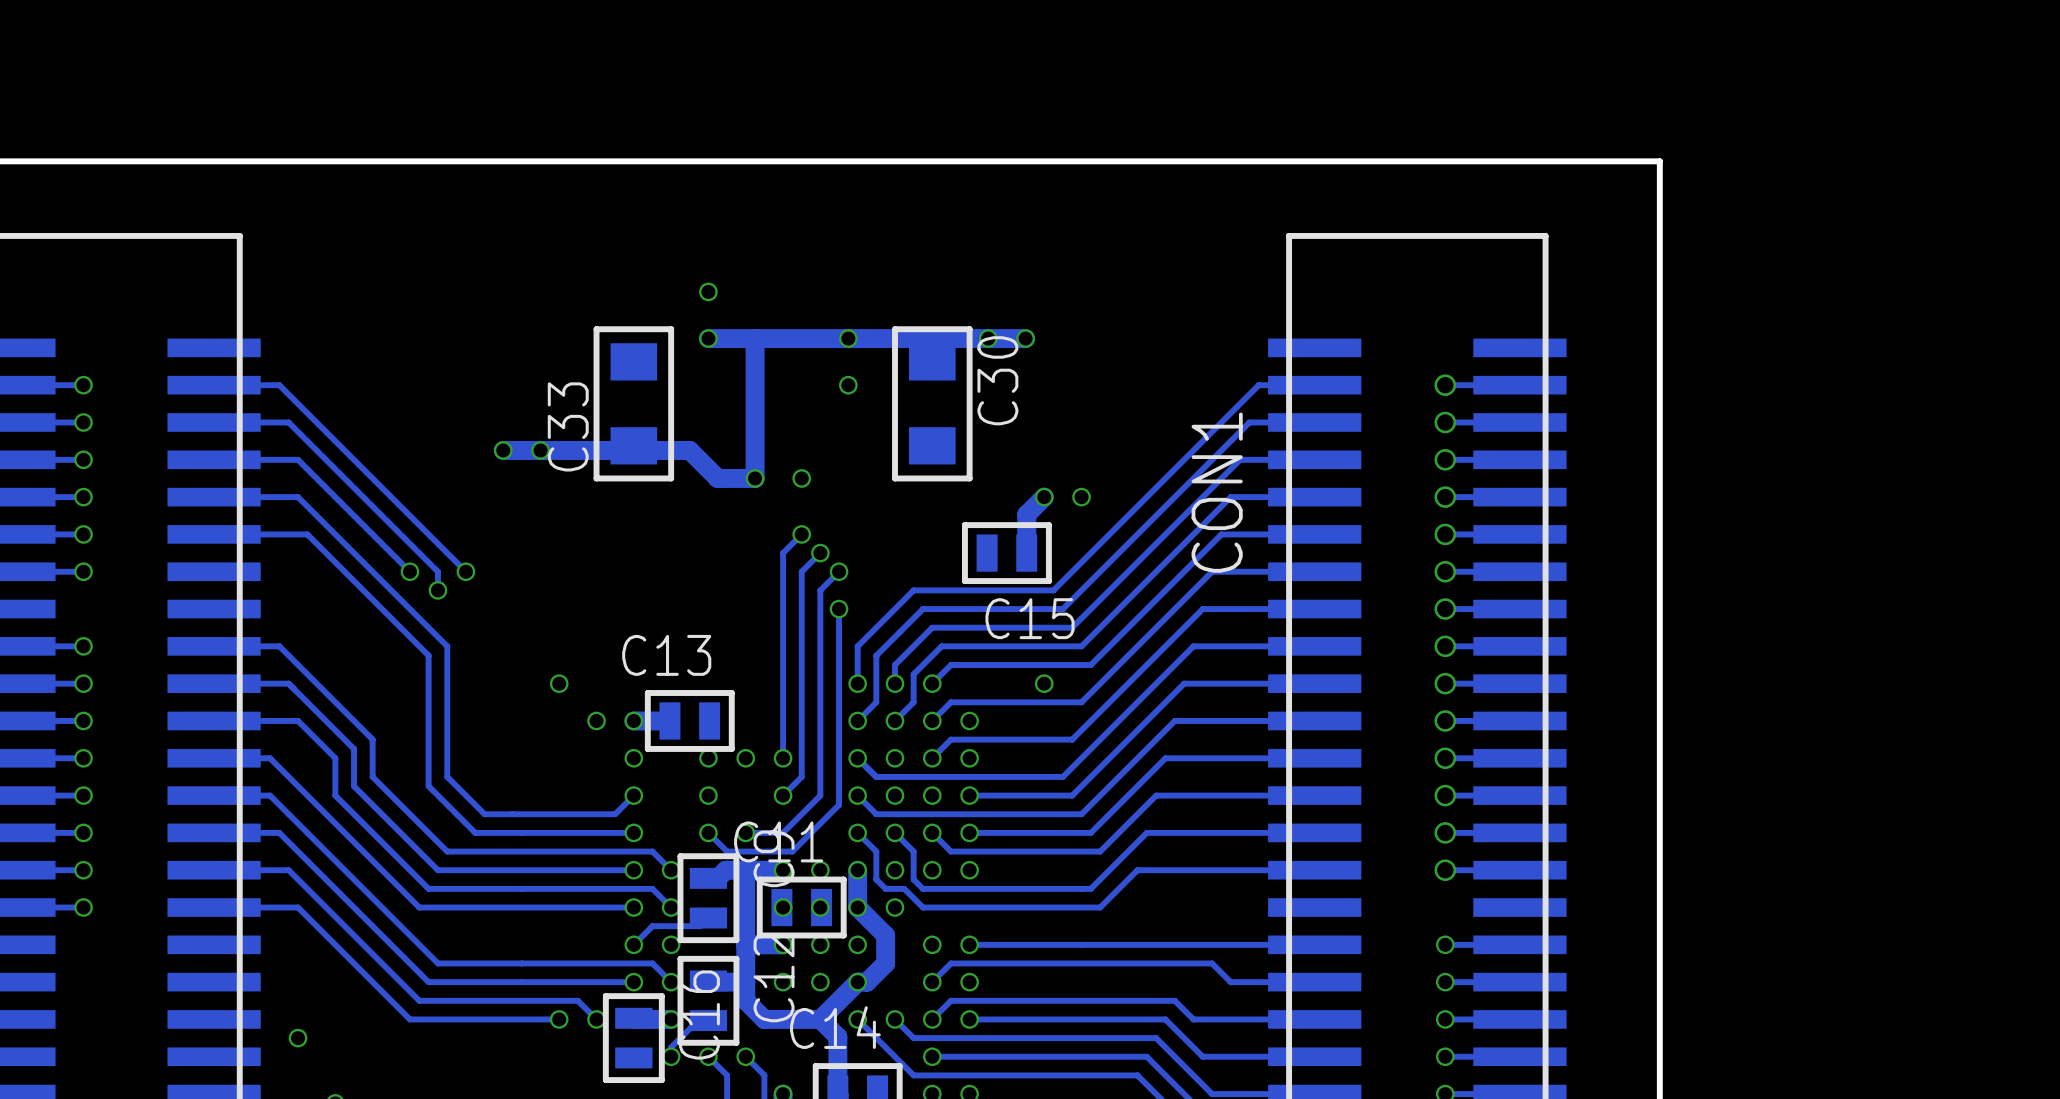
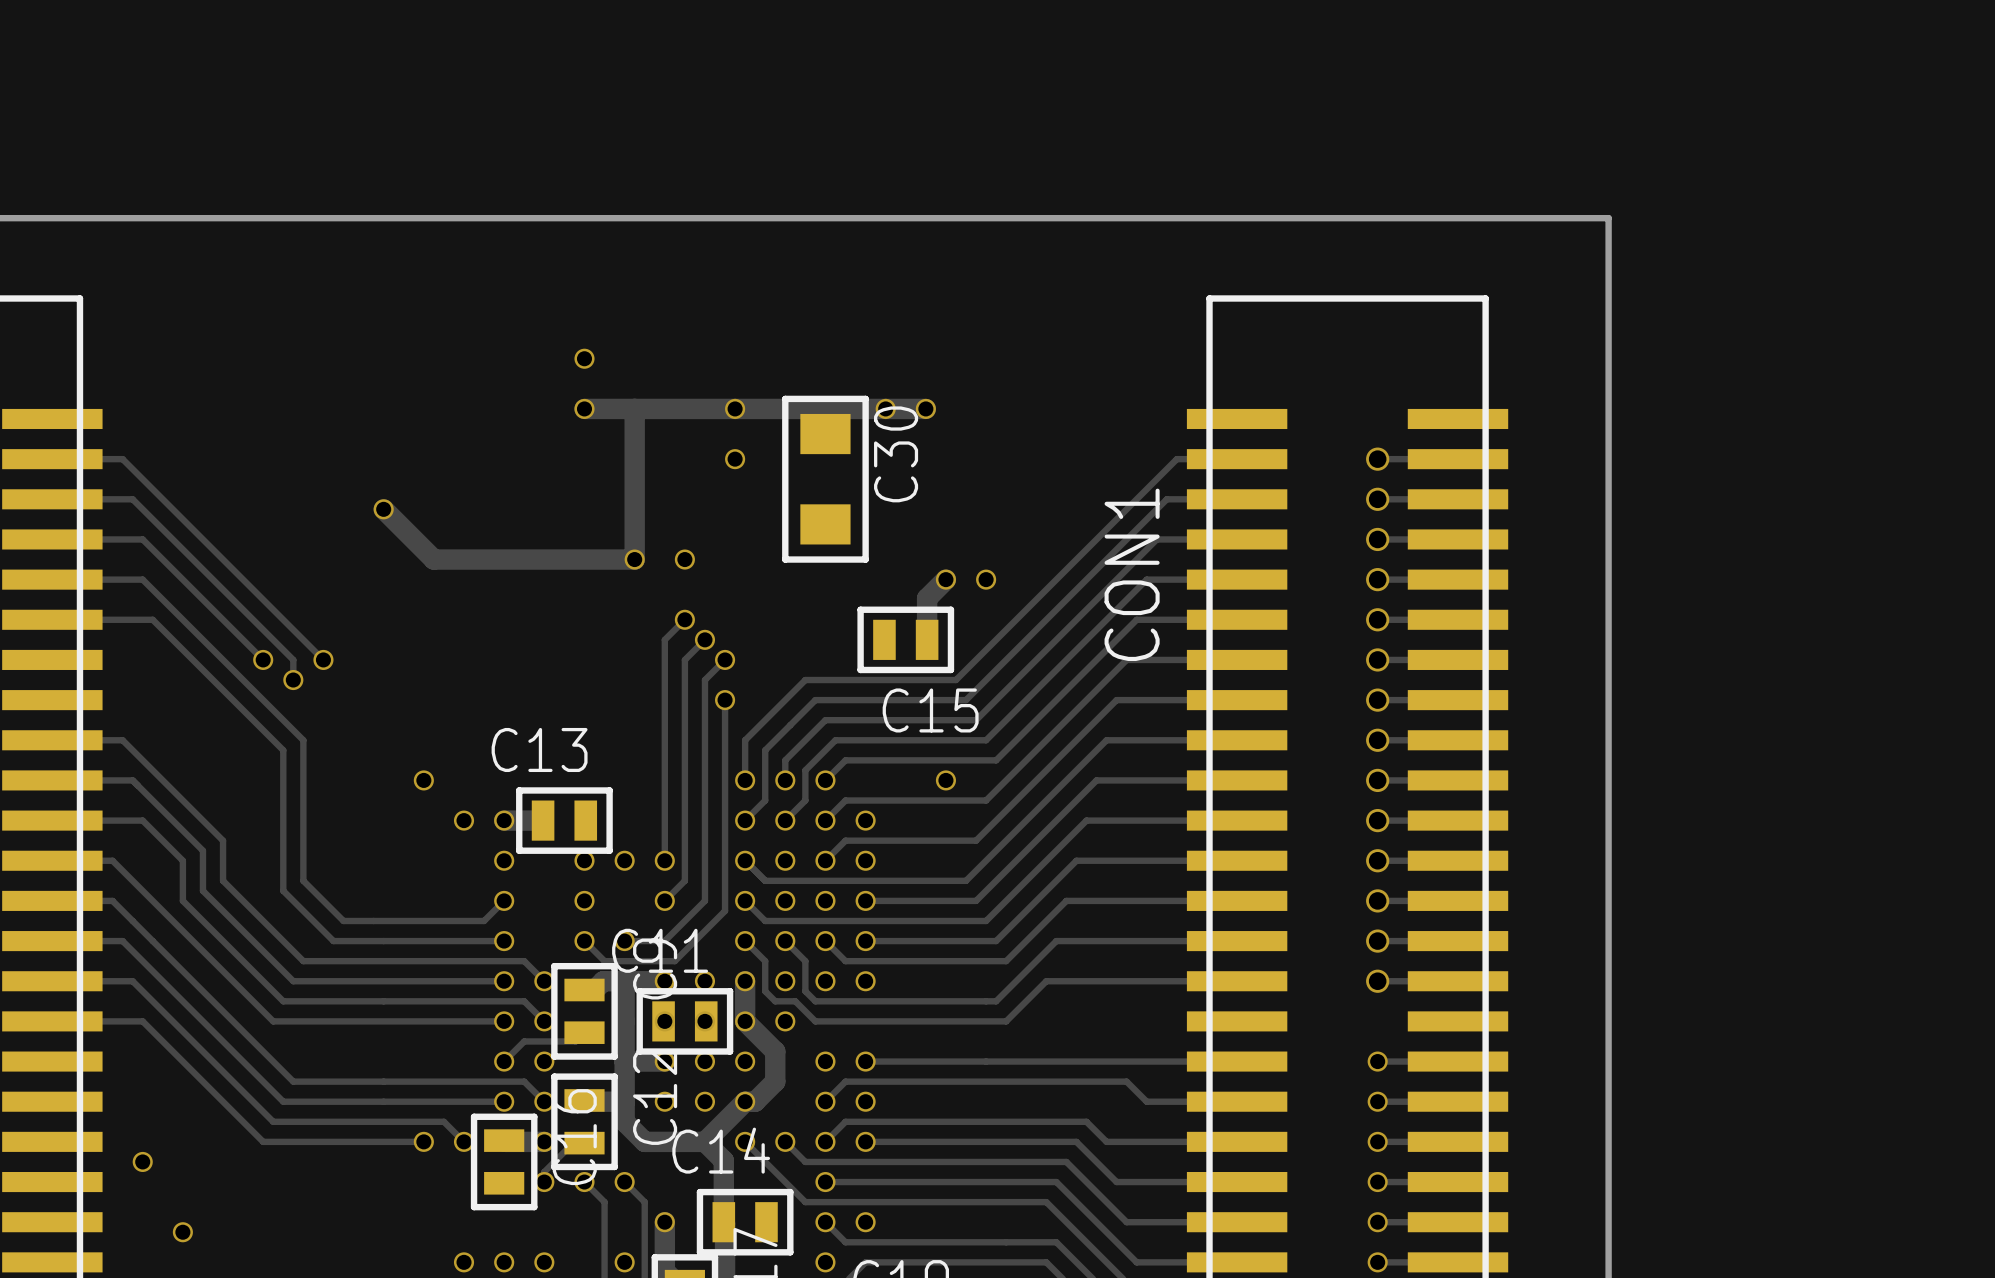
C33: (633, 403) -> none
via: none -> (383, 509)
track: (503, 450) (629, 450) (633, 445) (638, 450) (689, 450) (717, 478) -> (383, 509) (433, 559) (594, 559)
via: (503, 450) -> none
via: (540, 450) -> none

